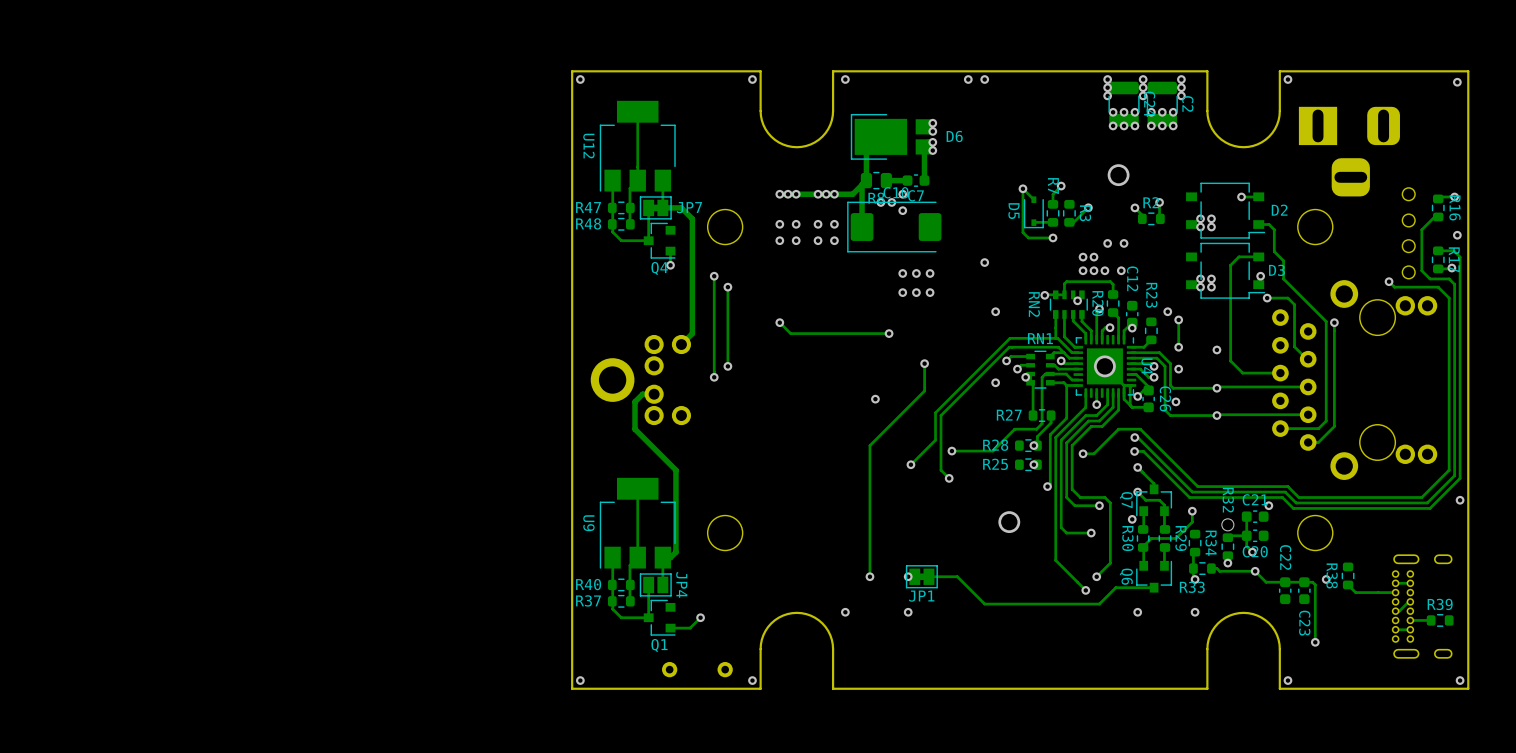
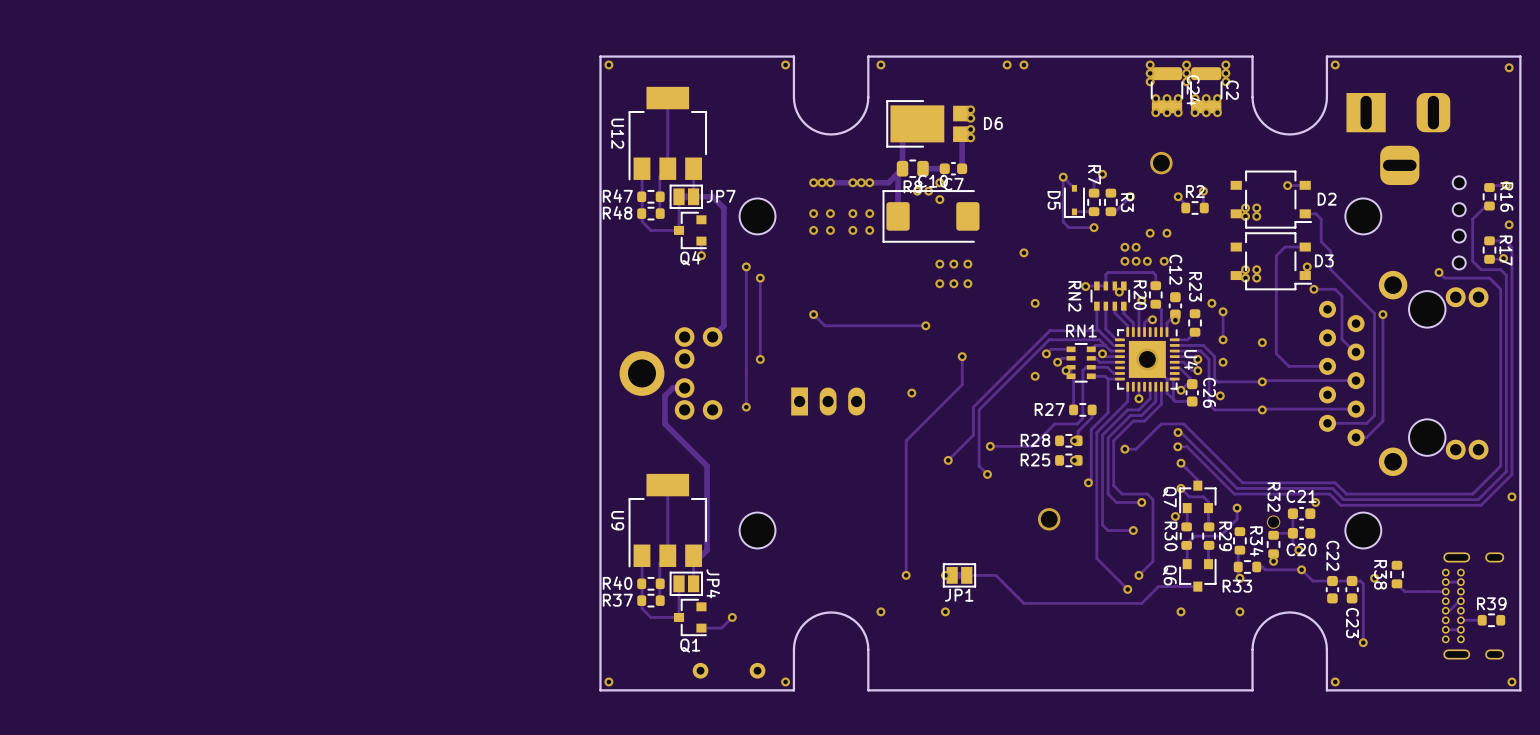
track: none -> (746, 370) (746, 407)
via position: (714, 377) -> (746, 407)
part: none -> (828, 401)

